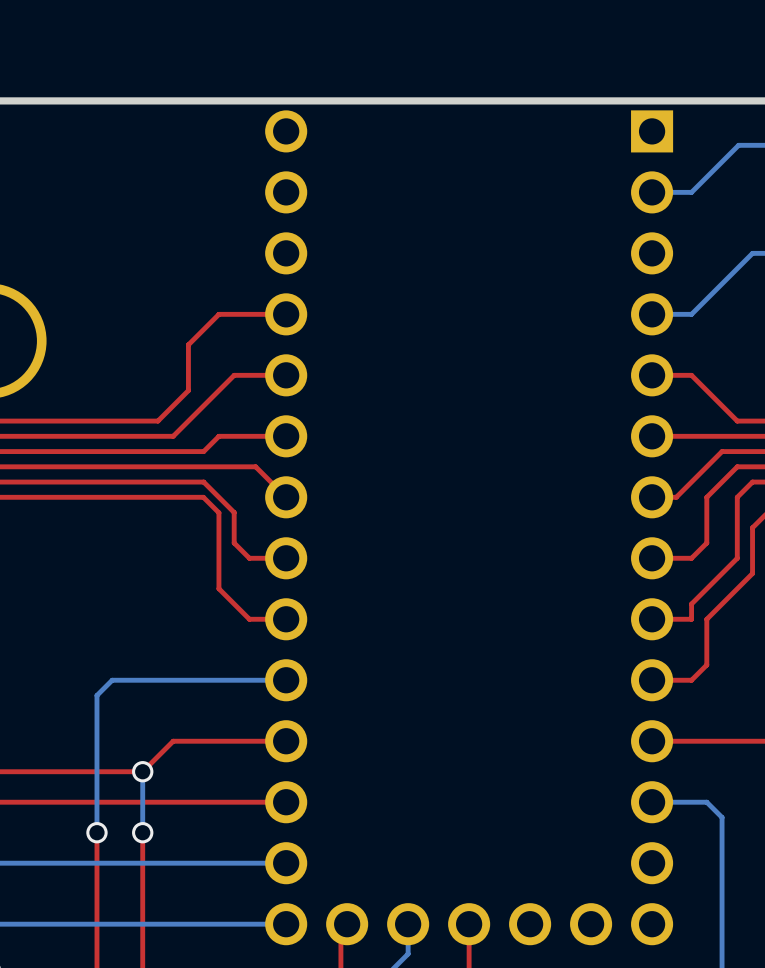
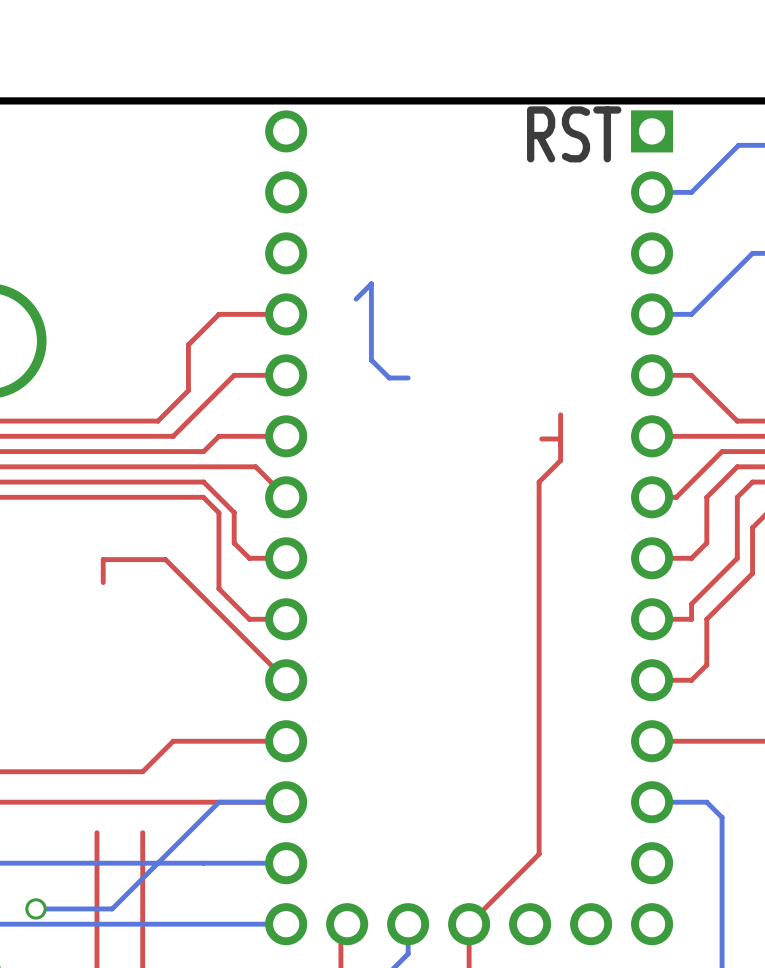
text: none -> RST (574, 134)
bottom track: none -> (356, 299) (371, 283) (371, 360) (389, 377) (408, 377)
top track: none -> (560, 414) (560, 460) (539, 482) (539, 854) (469, 924)
top track: none -> (560, 438) (541, 438)
top track: none -> (103, 582) (103, 559) (165, 559) (286, 680)
bottom track: (286, 680) (112, 680) (96, 695) (96, 832) -> none
bottom track: (142, 771) (142, 832) -> none
via: (142, 771) -> none
bottom track: none -> (286, 802) (218, 802) (112, 908) (35, 908)
via: (96, 832) -> none
via: (142, 832) -> none
via: none -> (35, 908)

